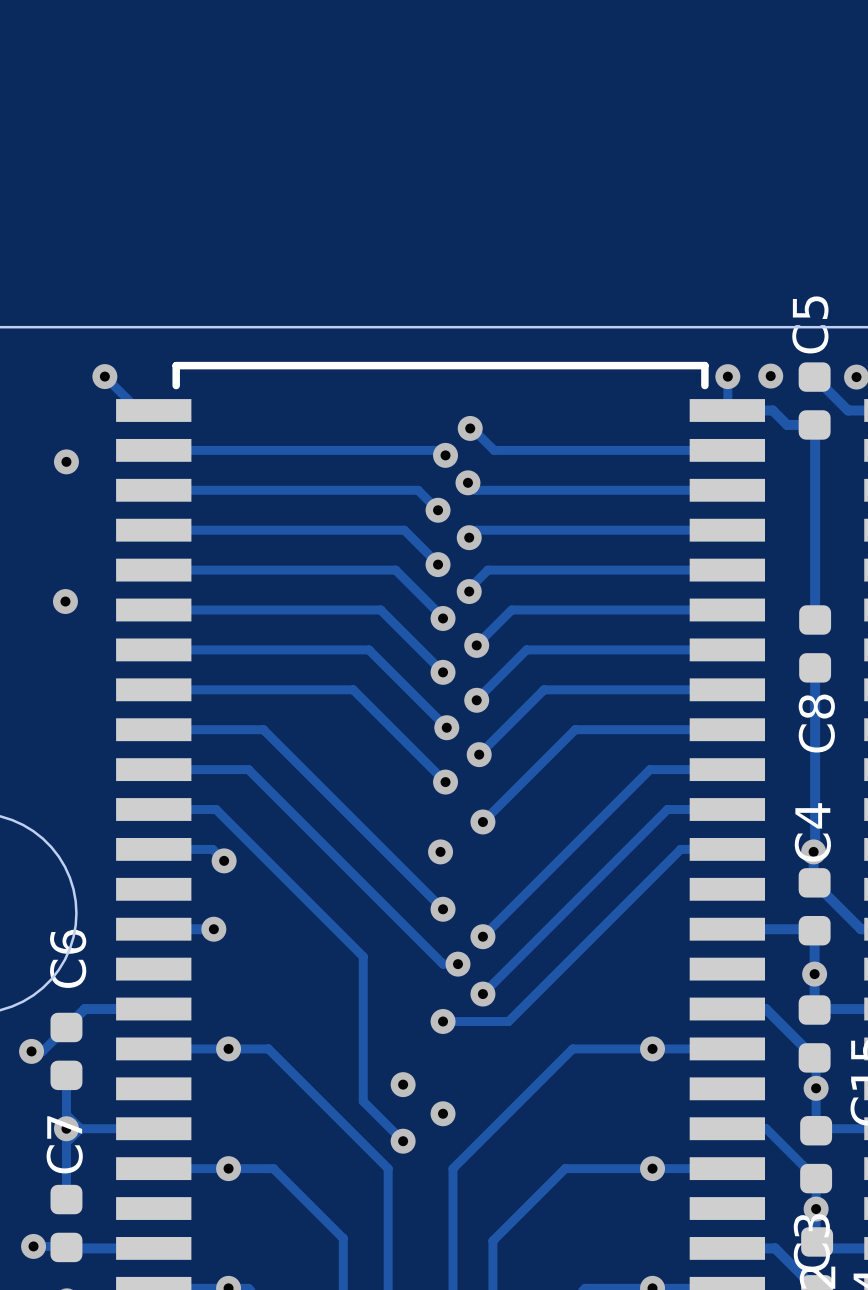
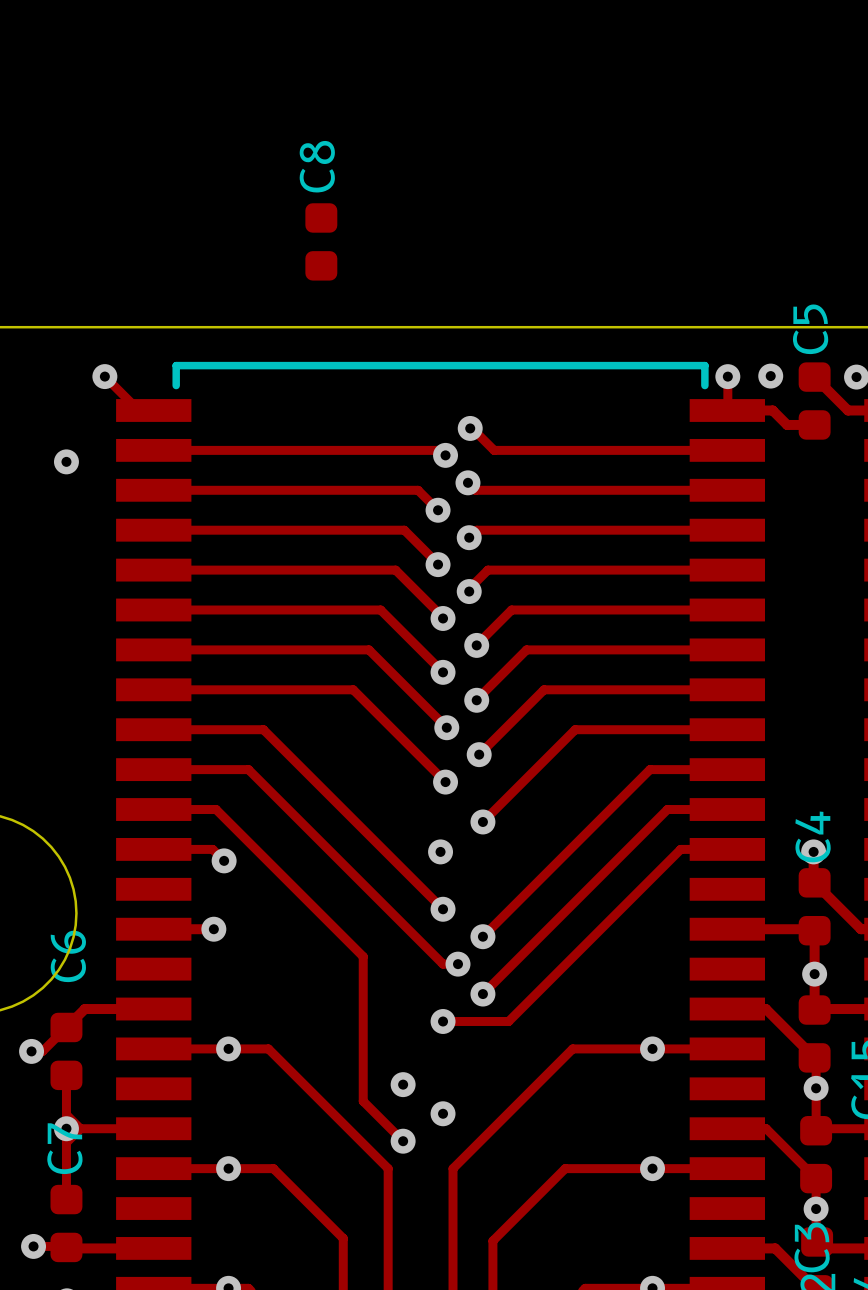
track: (815, 425) (815, 619) -> none
via: (65, 601) -> none
C8 position: (815, 643) -> (321, 241)
track: (815, 667) (813, 851) -> none
C8 name position: C8 (816, 723) -> C8 (317, 166)

